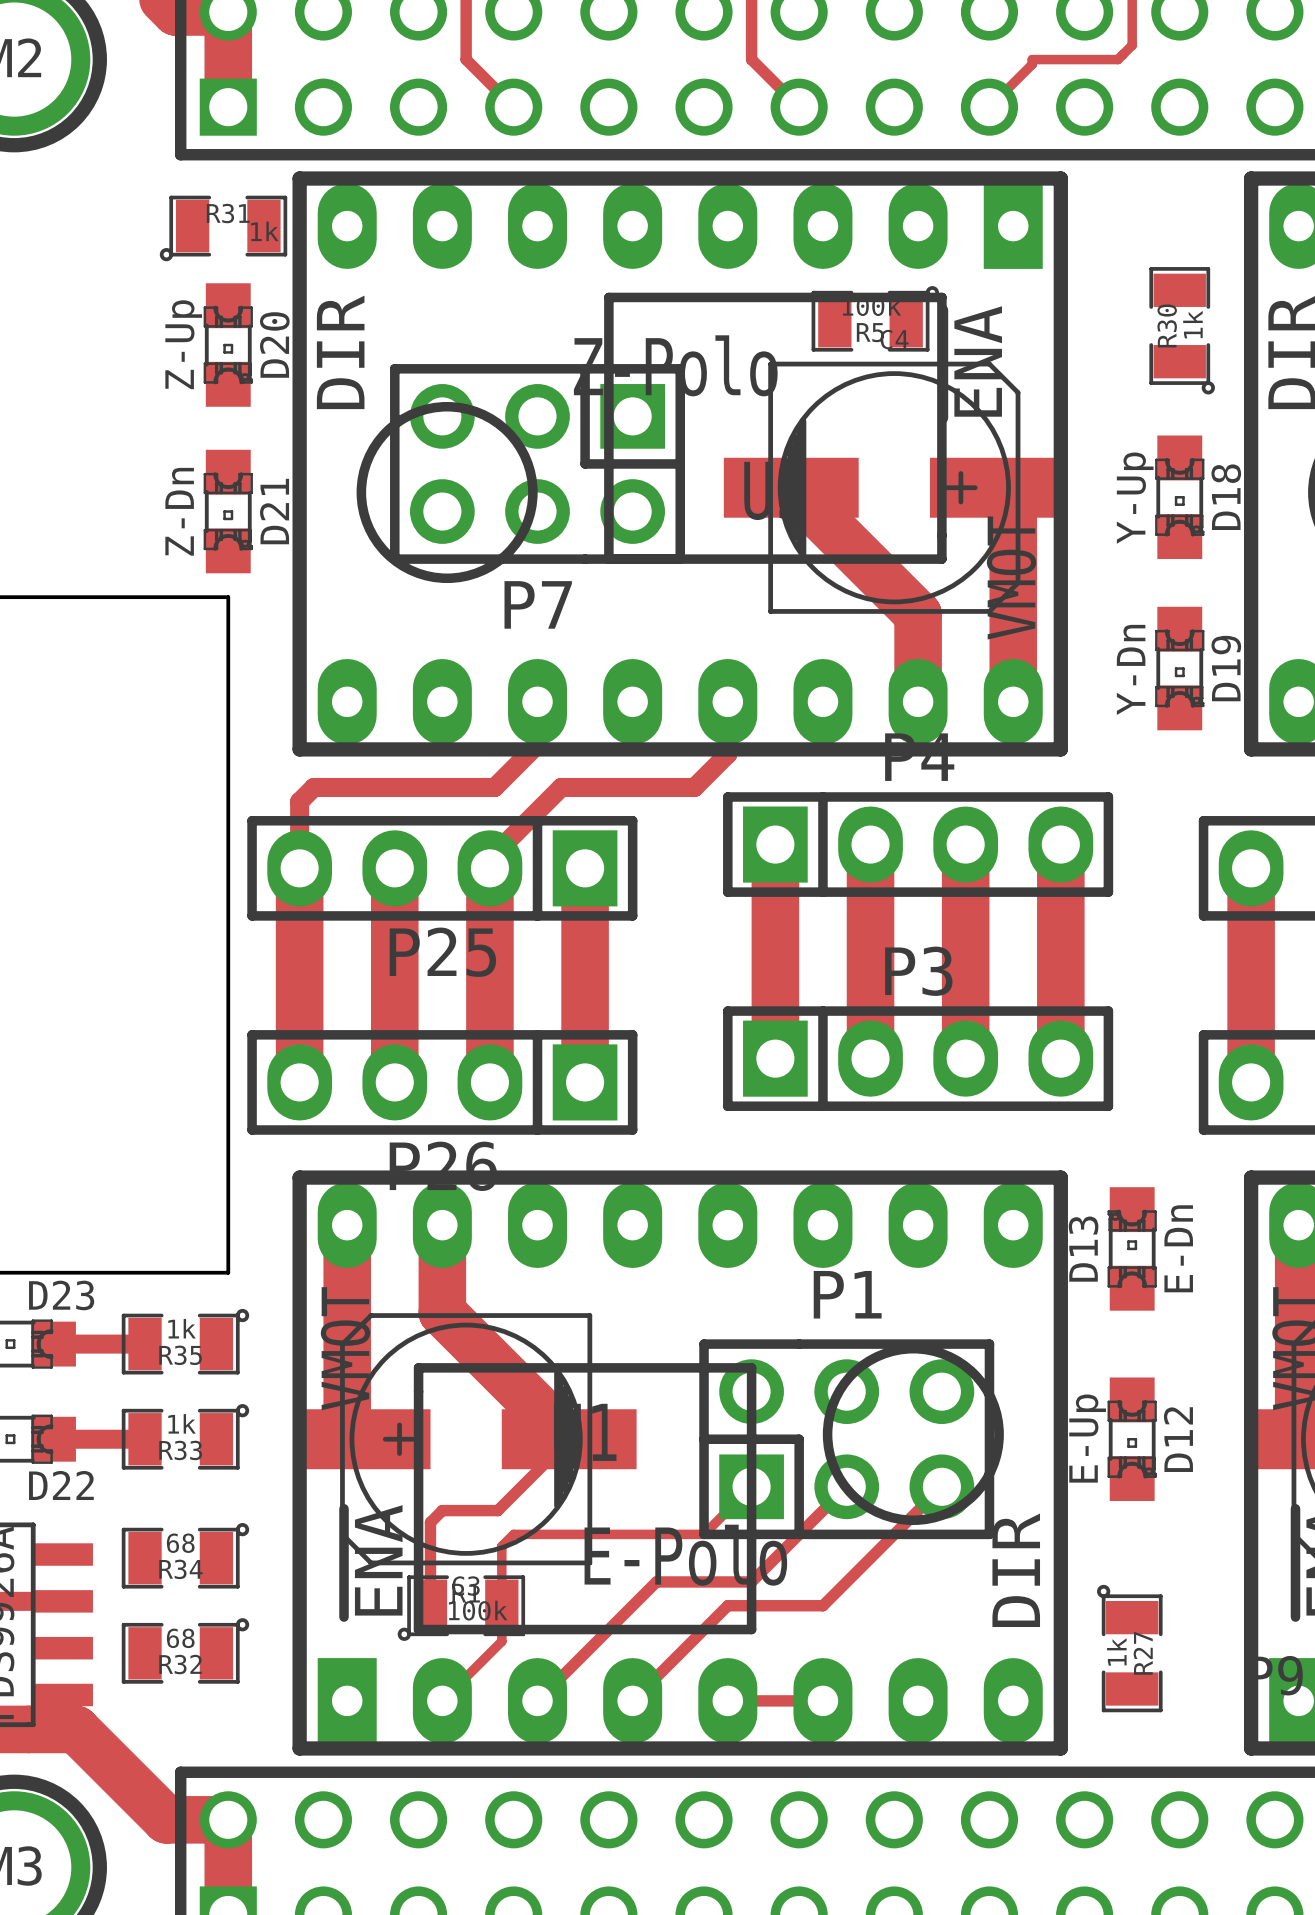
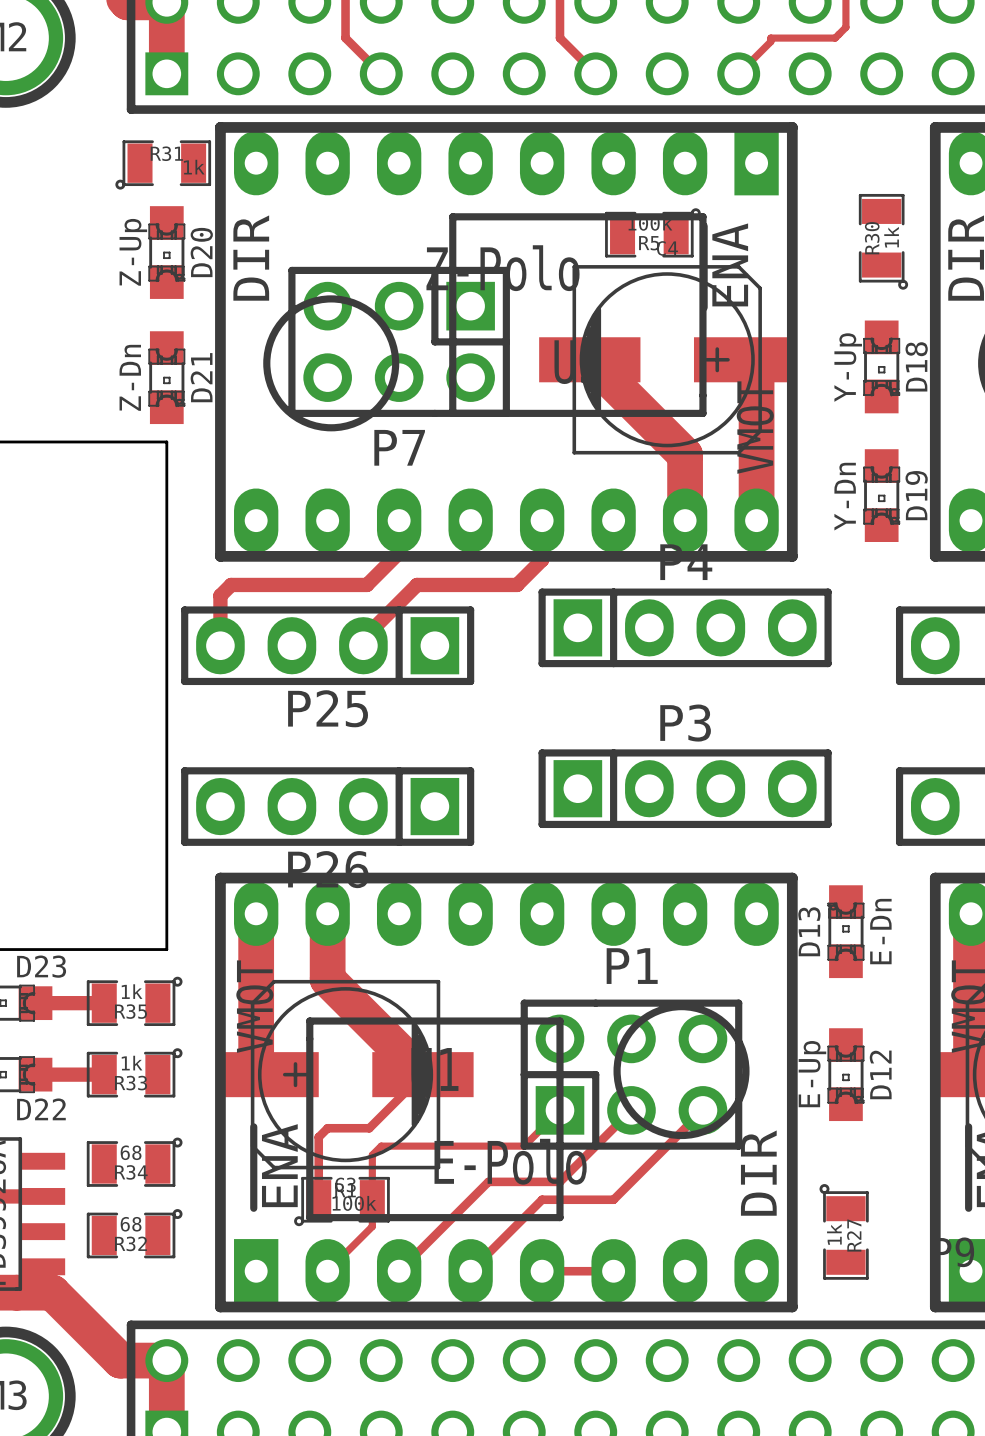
track: (775, 844) (775, 1058) -> none
track: (870, 844) (870, 1058) -> none
track: (965, 844) (965, 1058) -> none
track: (1060, 844) (1060, 1058) -> none
track: (299, 868) (299, 1082) -> none
track: (394, 868) (394, 1082) -> none
track: (489, 868) (489, 1082) -> none
track: (585, 868) (585, 1082) -> none
track: (1251, 868) (1251, 1082) -> none

